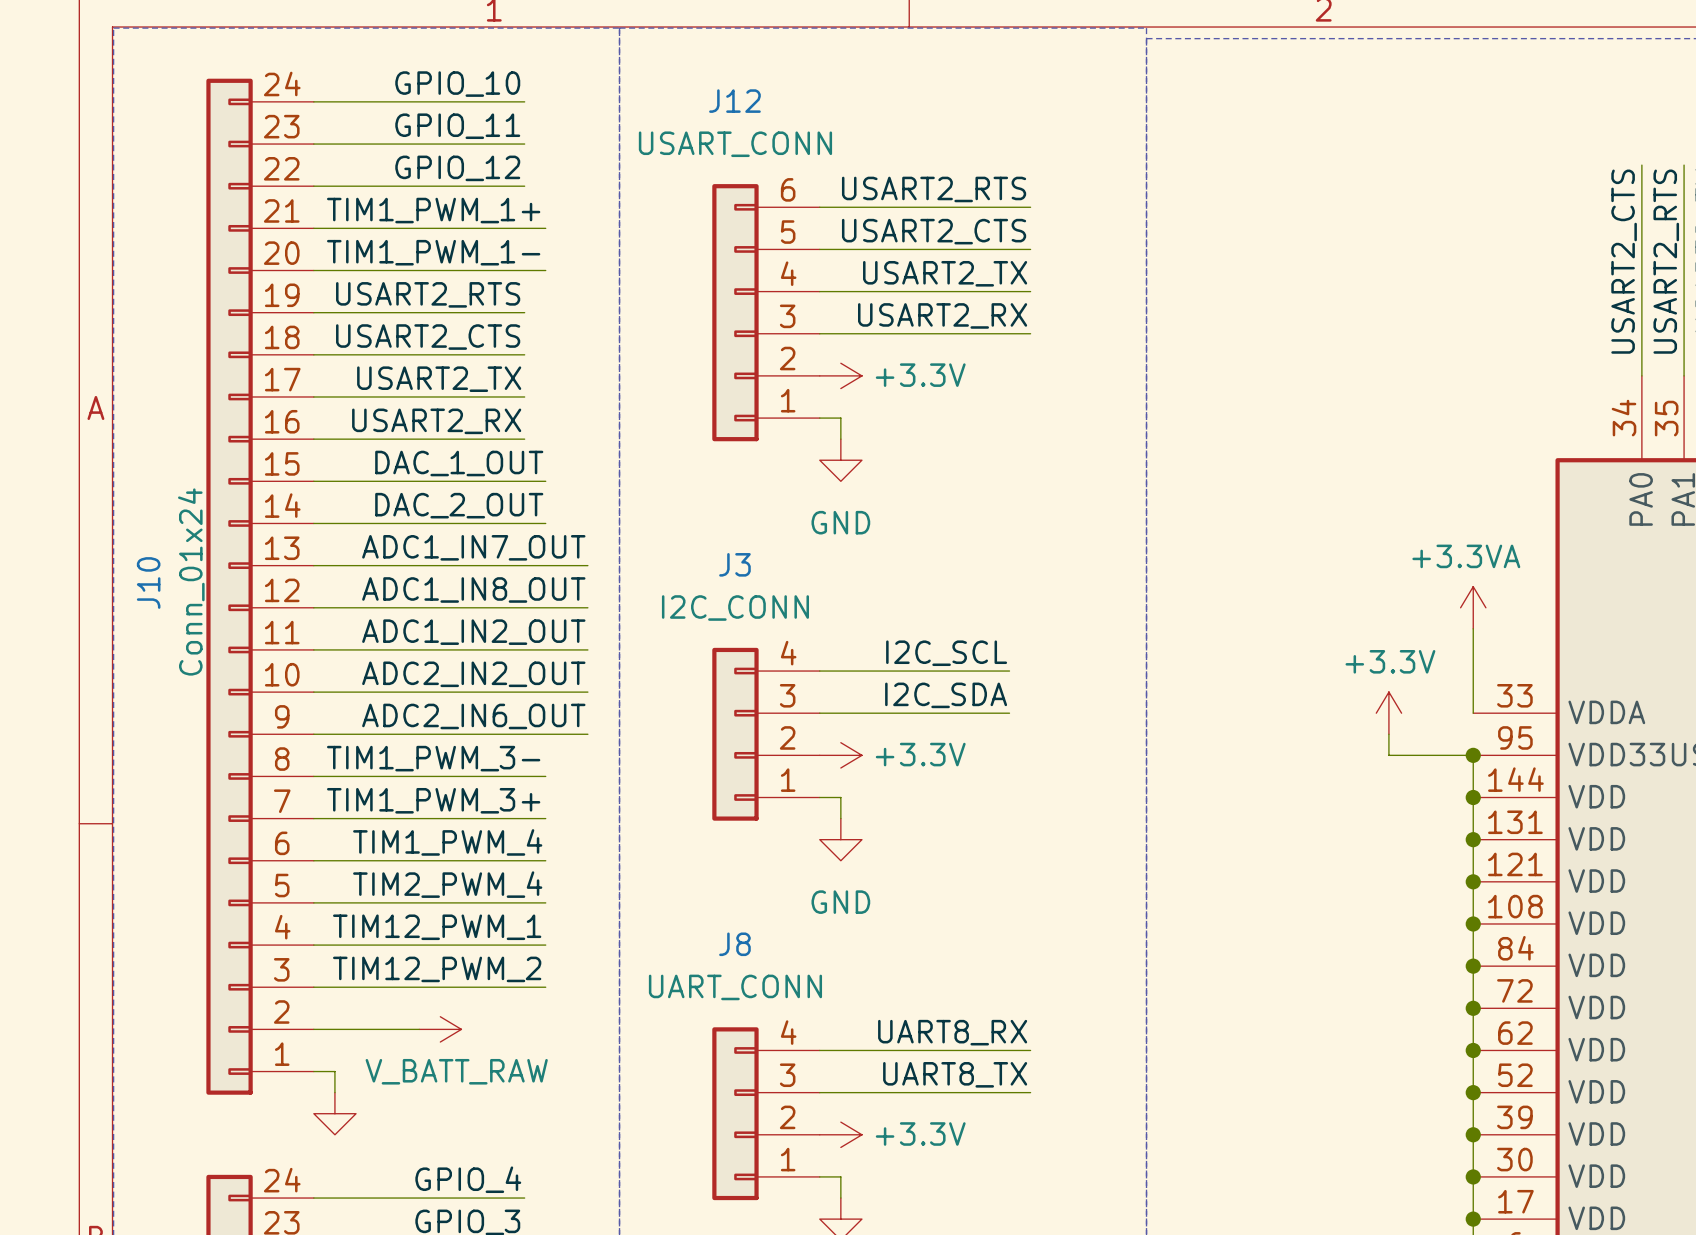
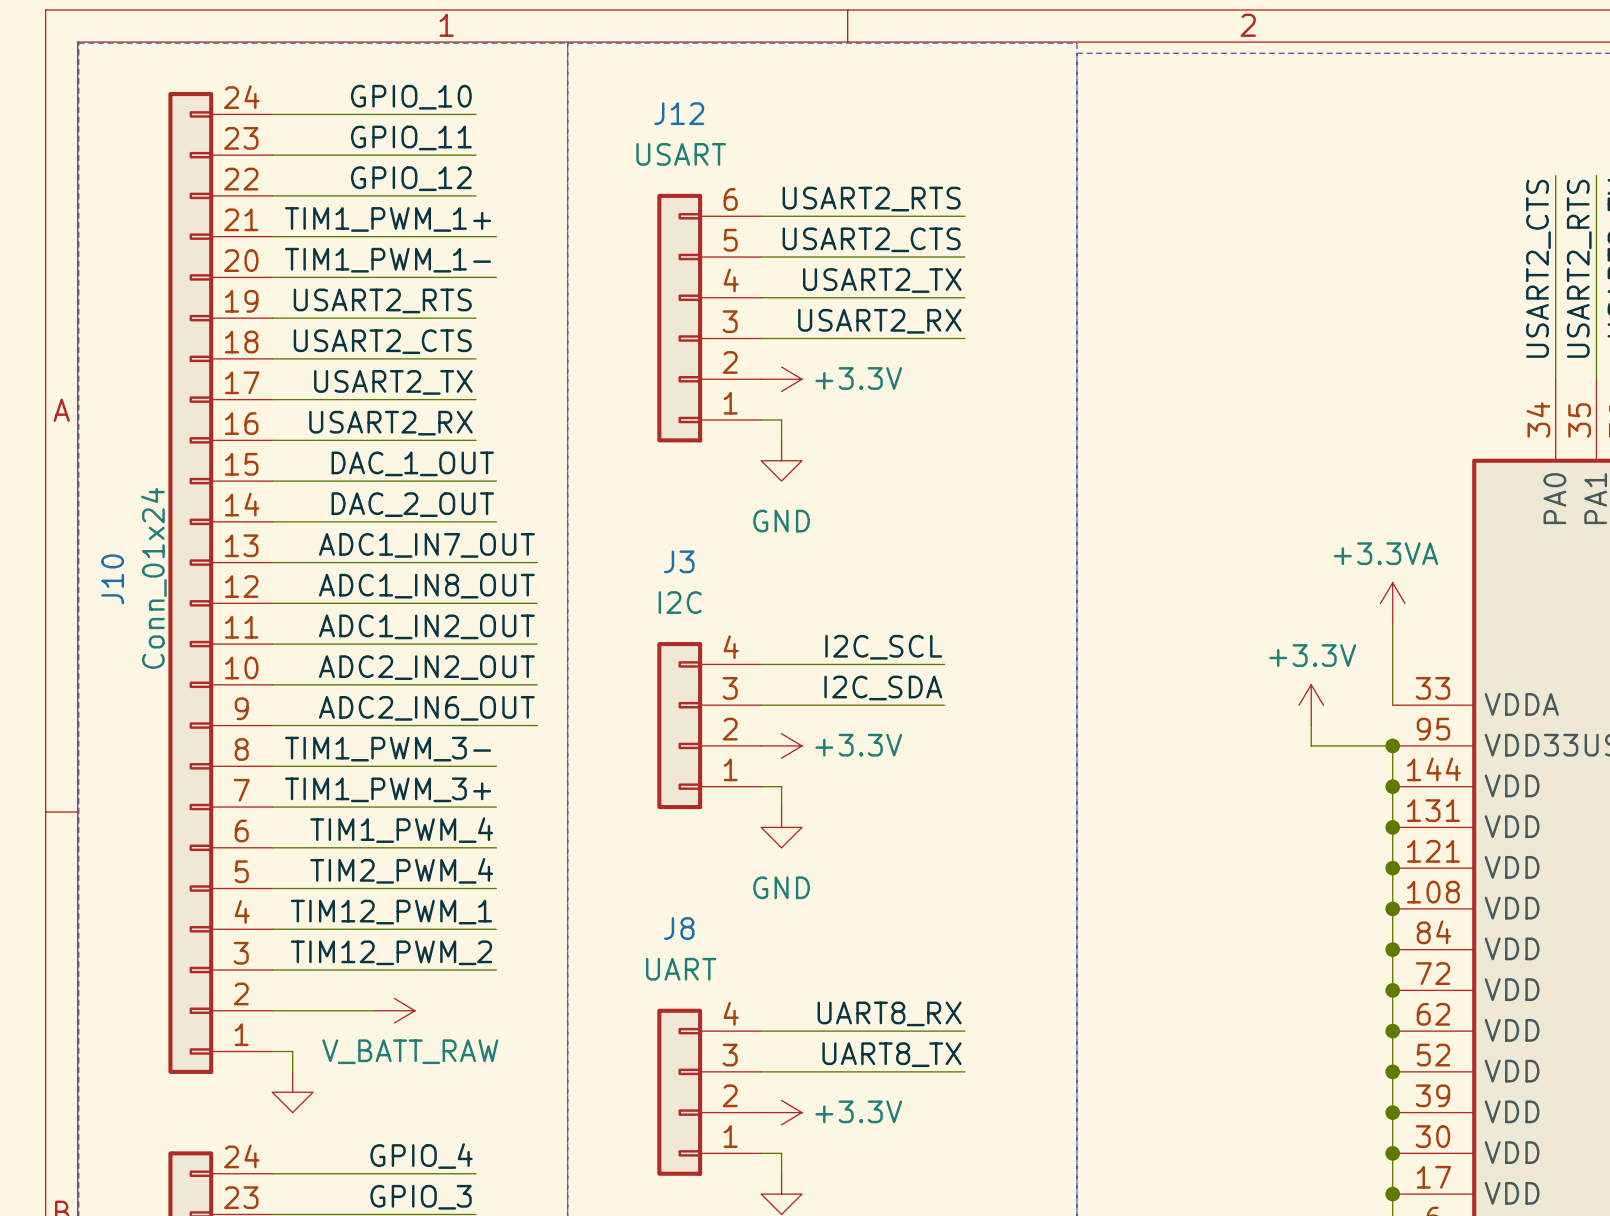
J12 value: USART_CONN (735, 144) -> USART (681, 154)
J3 value: I2C_CONN (735, 608) -> I2C (680, 602)
J8 value: UART_CONN (735, 987) -> UART (681, 969)

